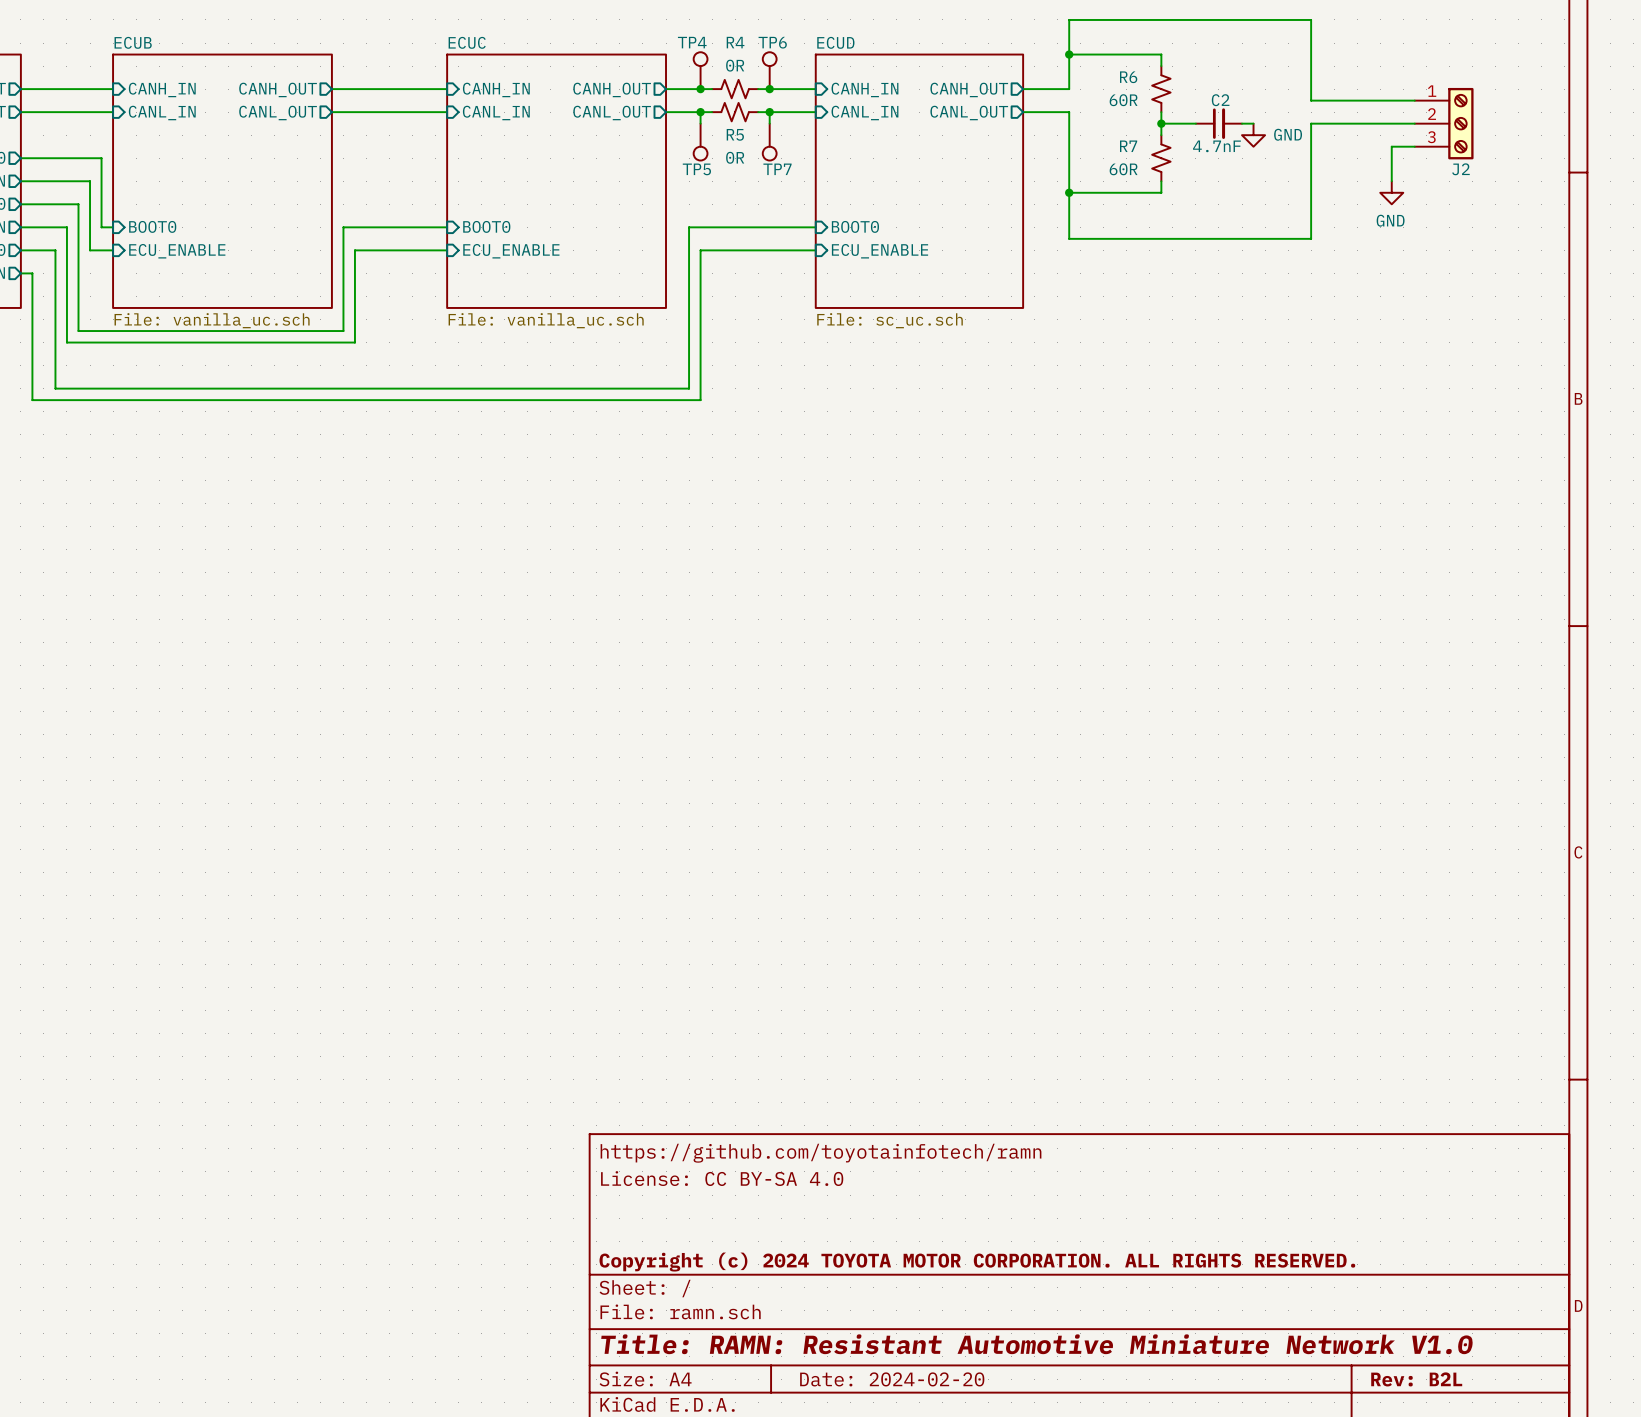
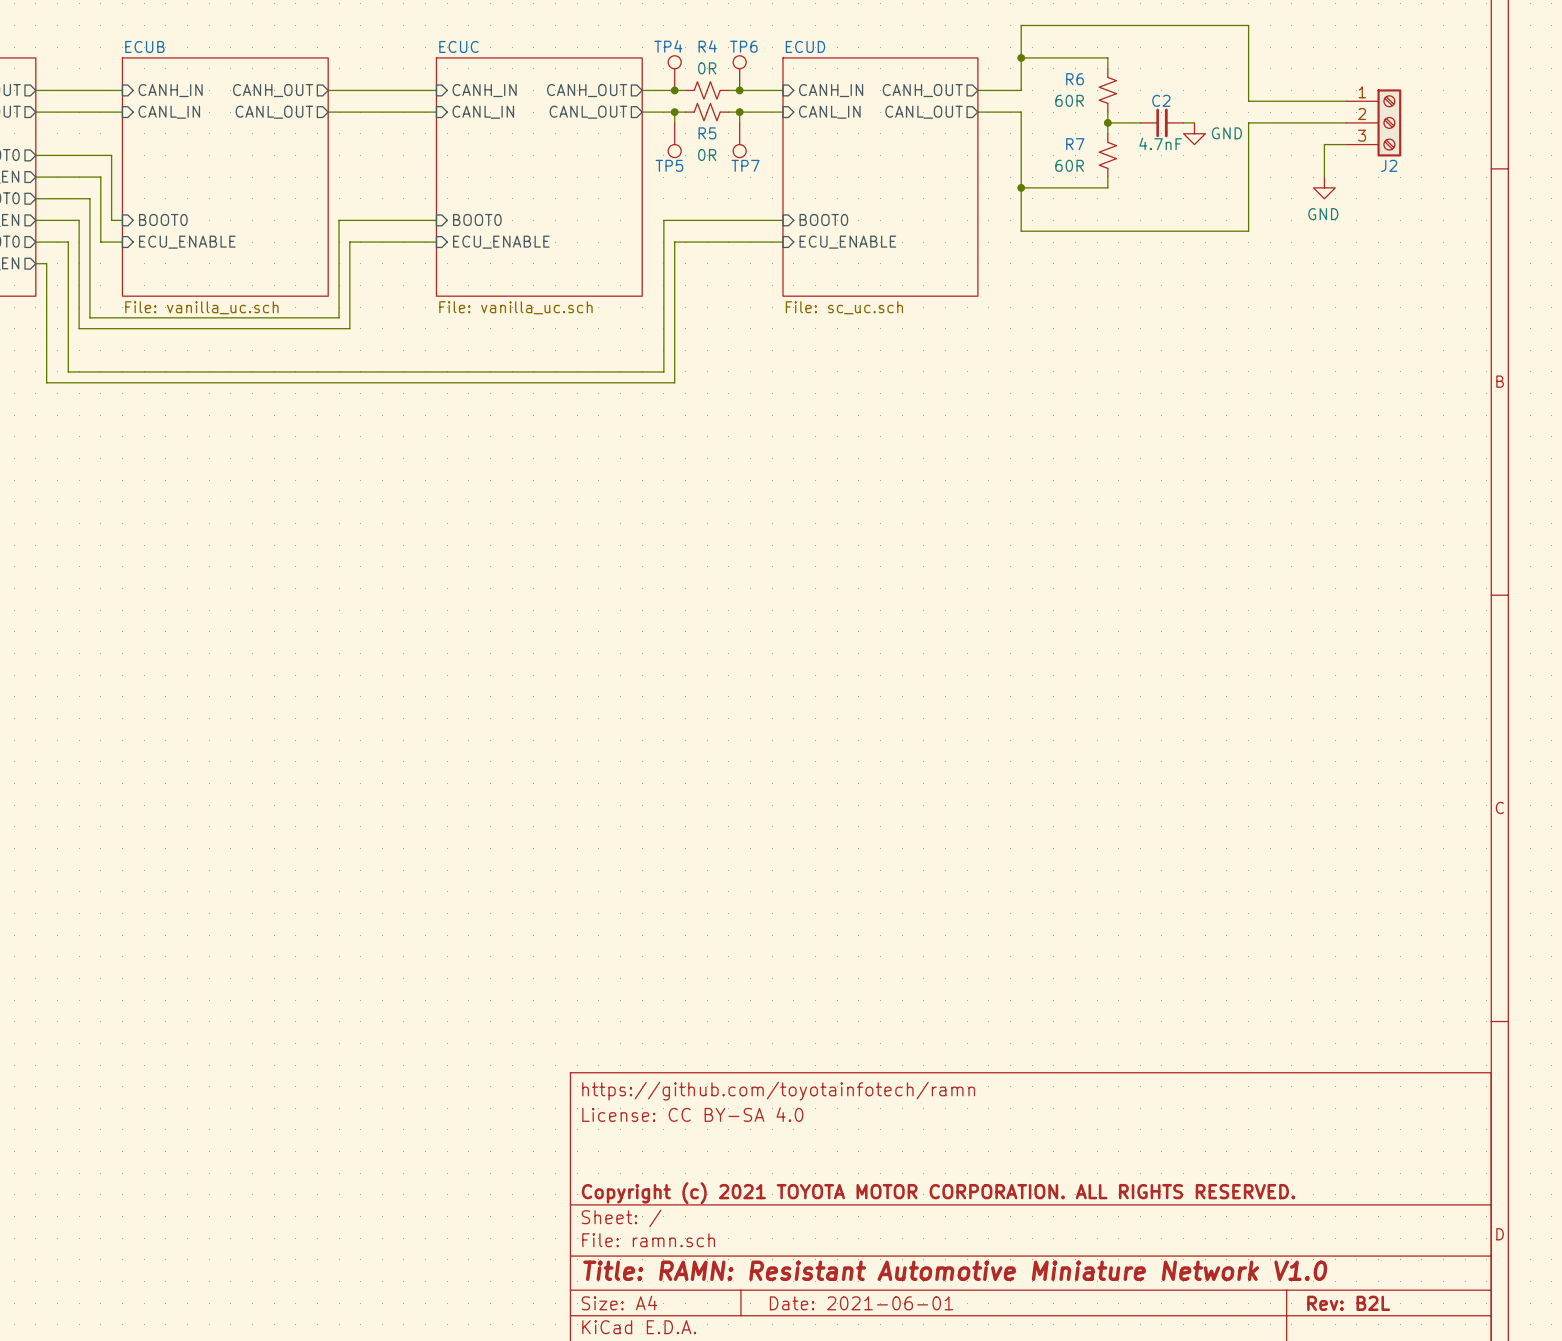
title block: Copyright (c) 2024 TOYOTA MOTOR CORPORATION. ALL RIGHTS RESERVED. (977, 1262) -> Copyright (c) 2021 TOYOTA MOTOR CORPORATION. ALL RIGHTS RESERVED. (938, 1193)
title block: Date: 2024-02-20 (892, 1379) -> Date: 2021-06-01 (861, 1303)

